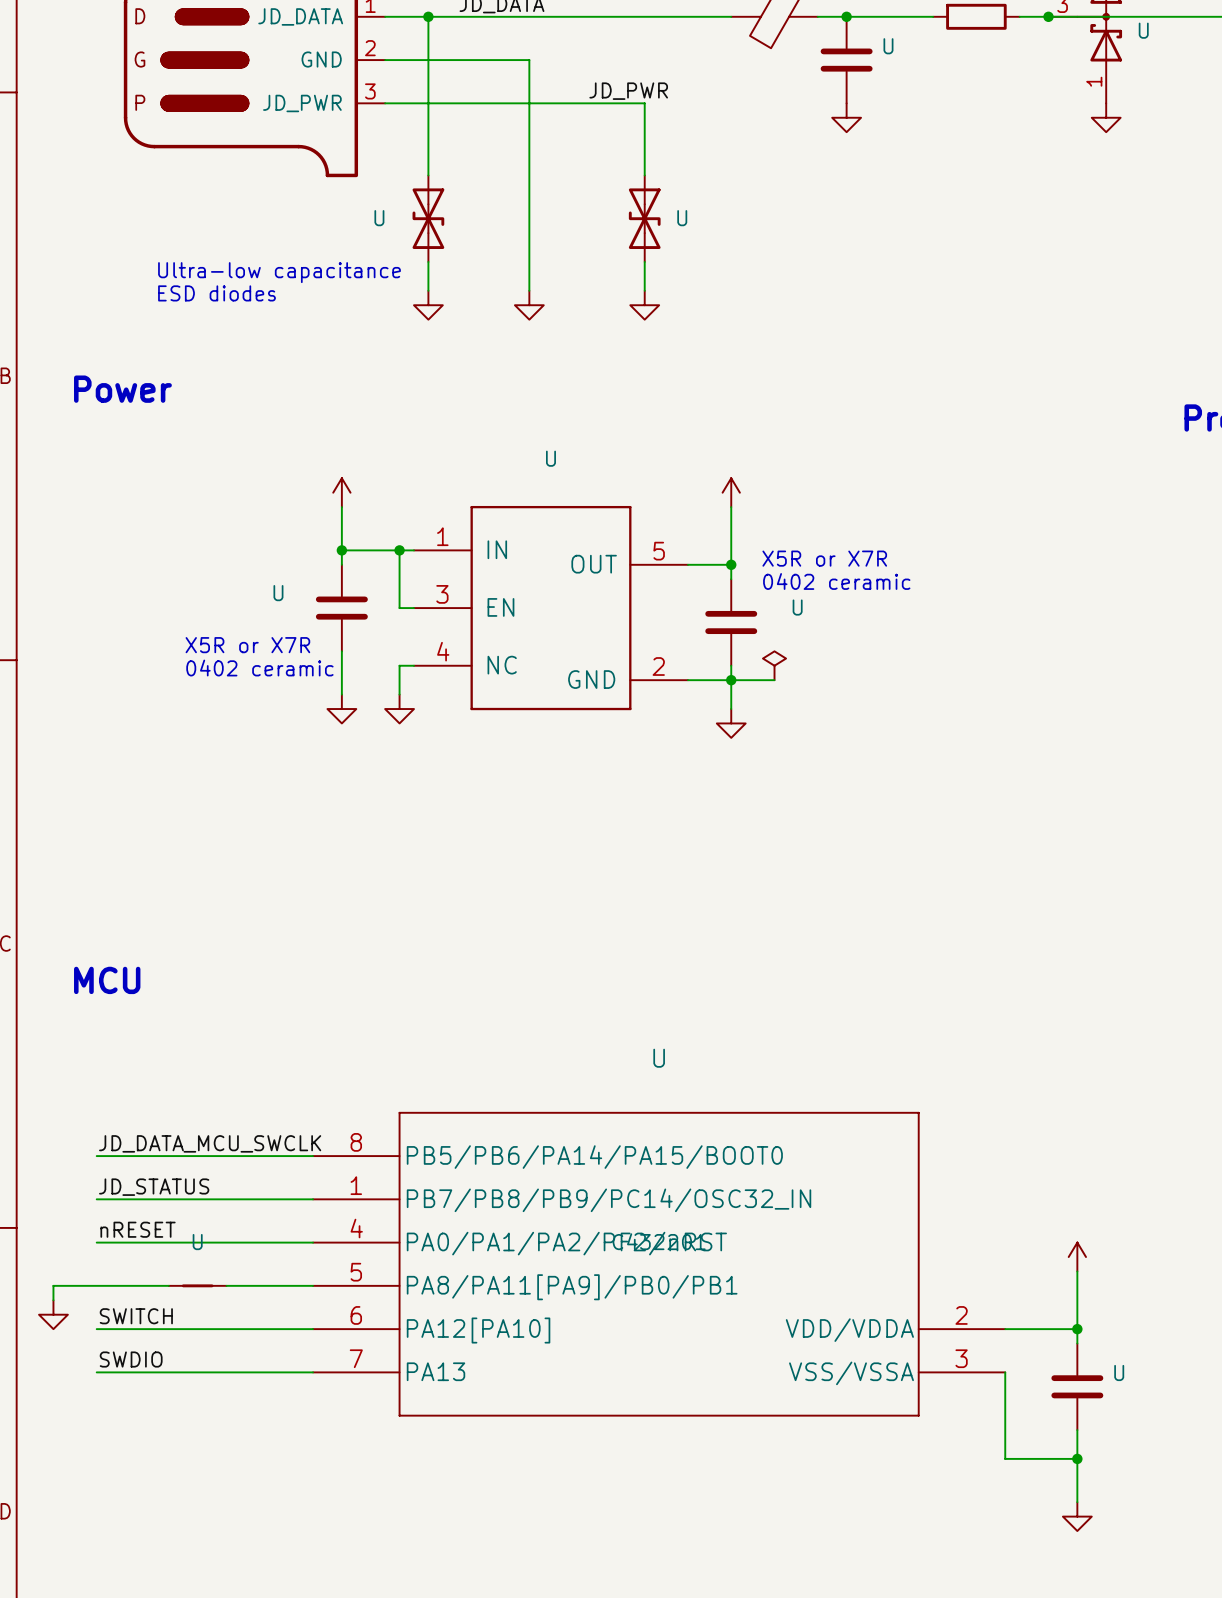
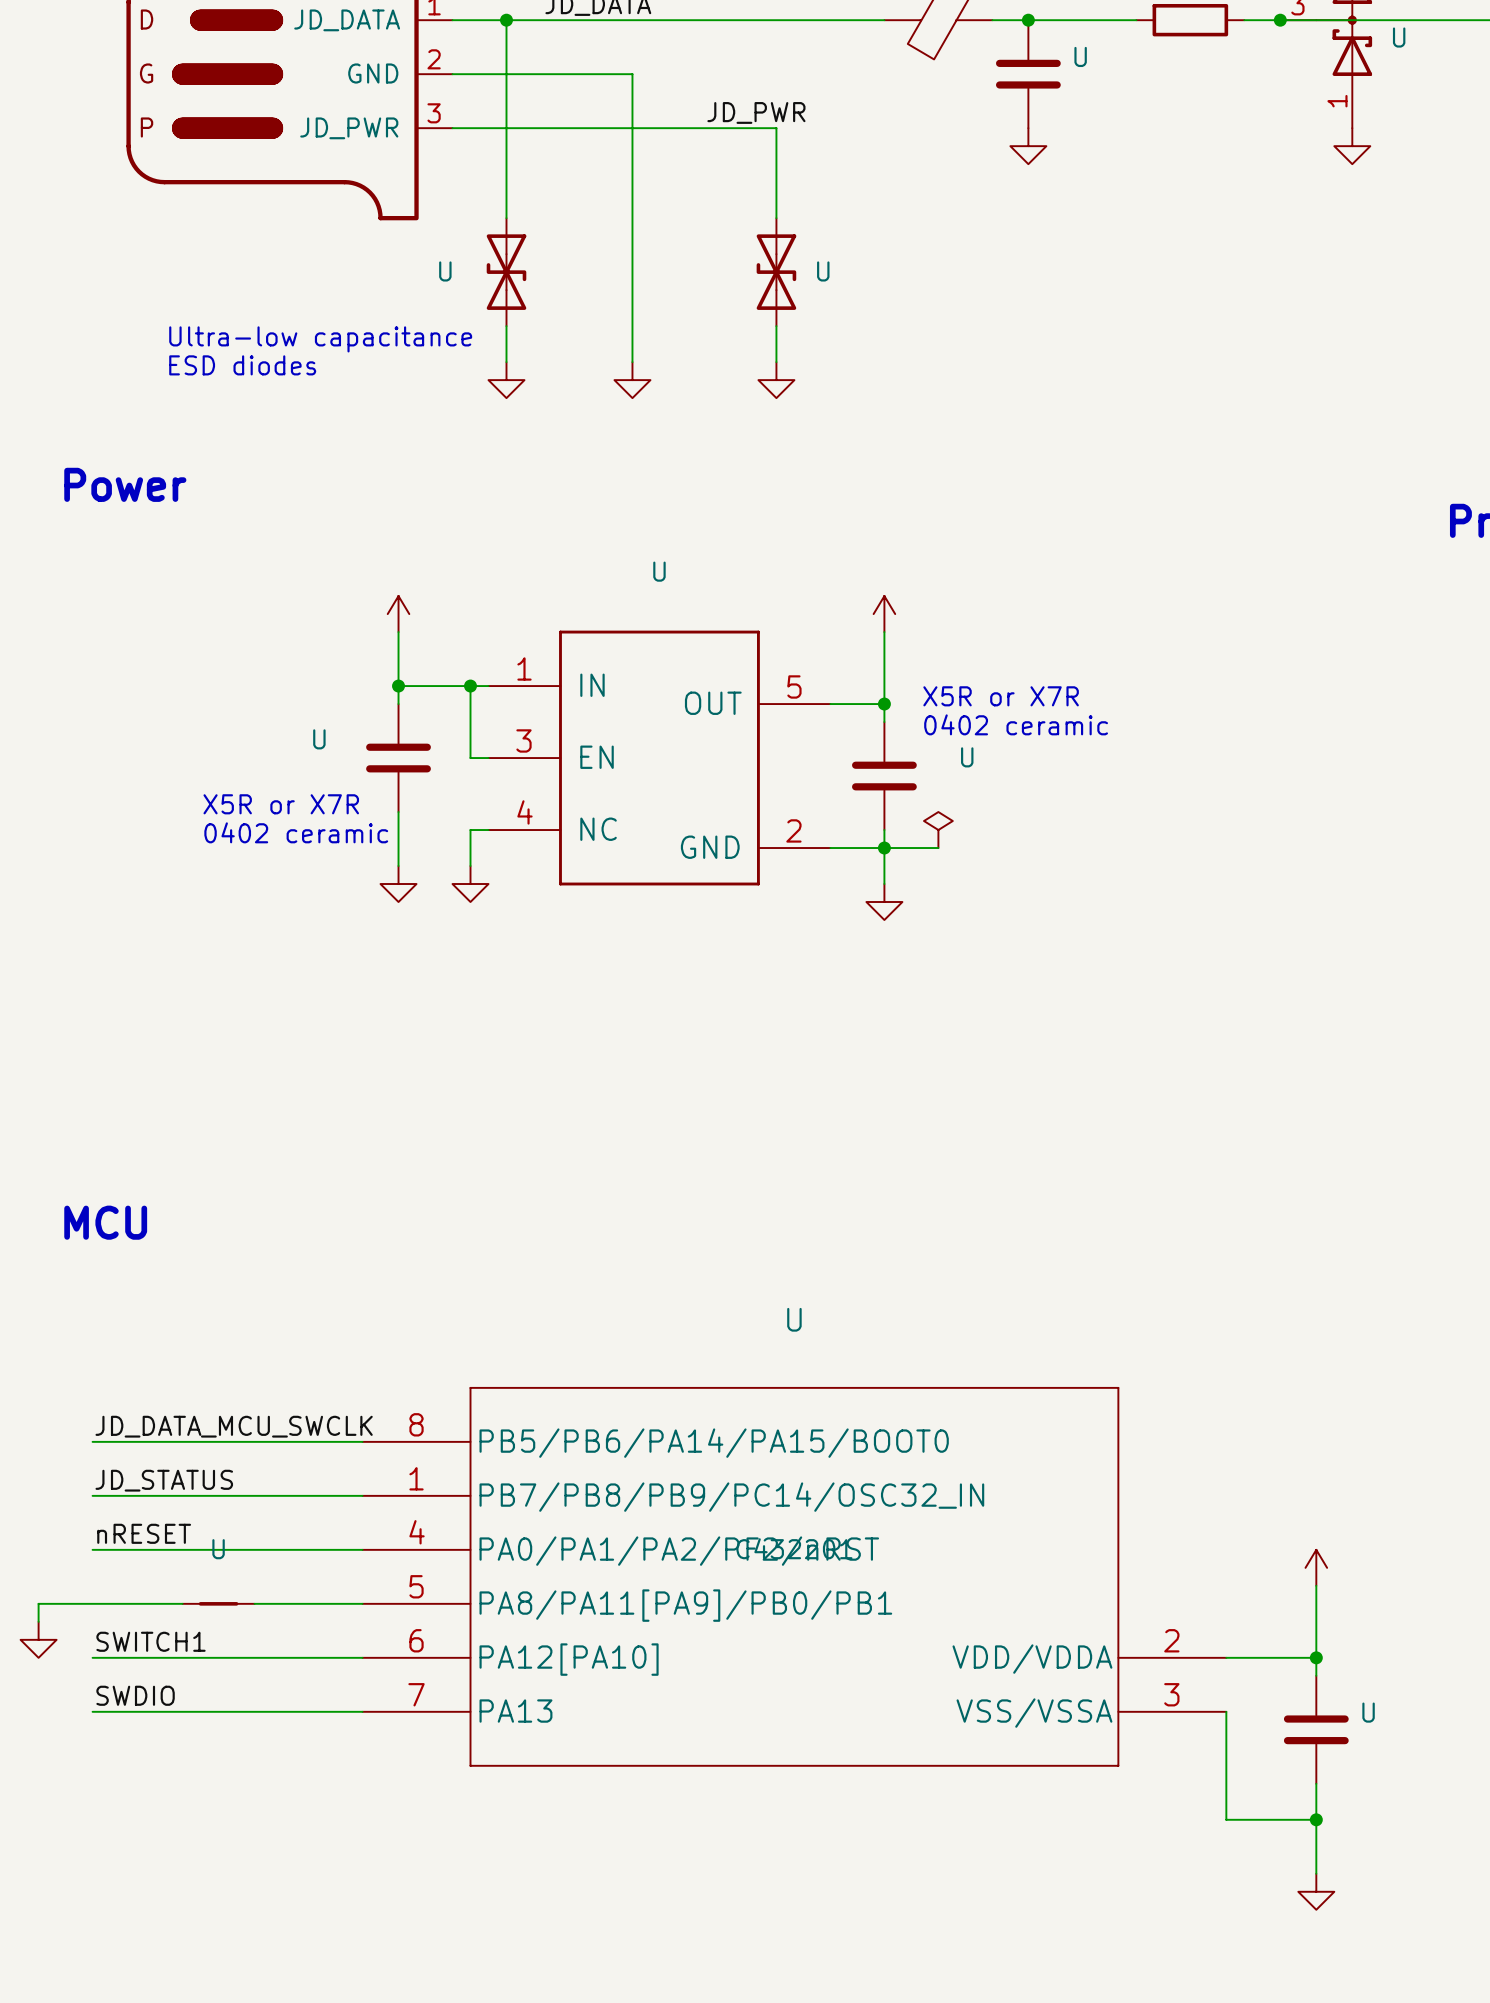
label: SWITCH (136, 1316) -> SWITCH1 (150, 1641)

